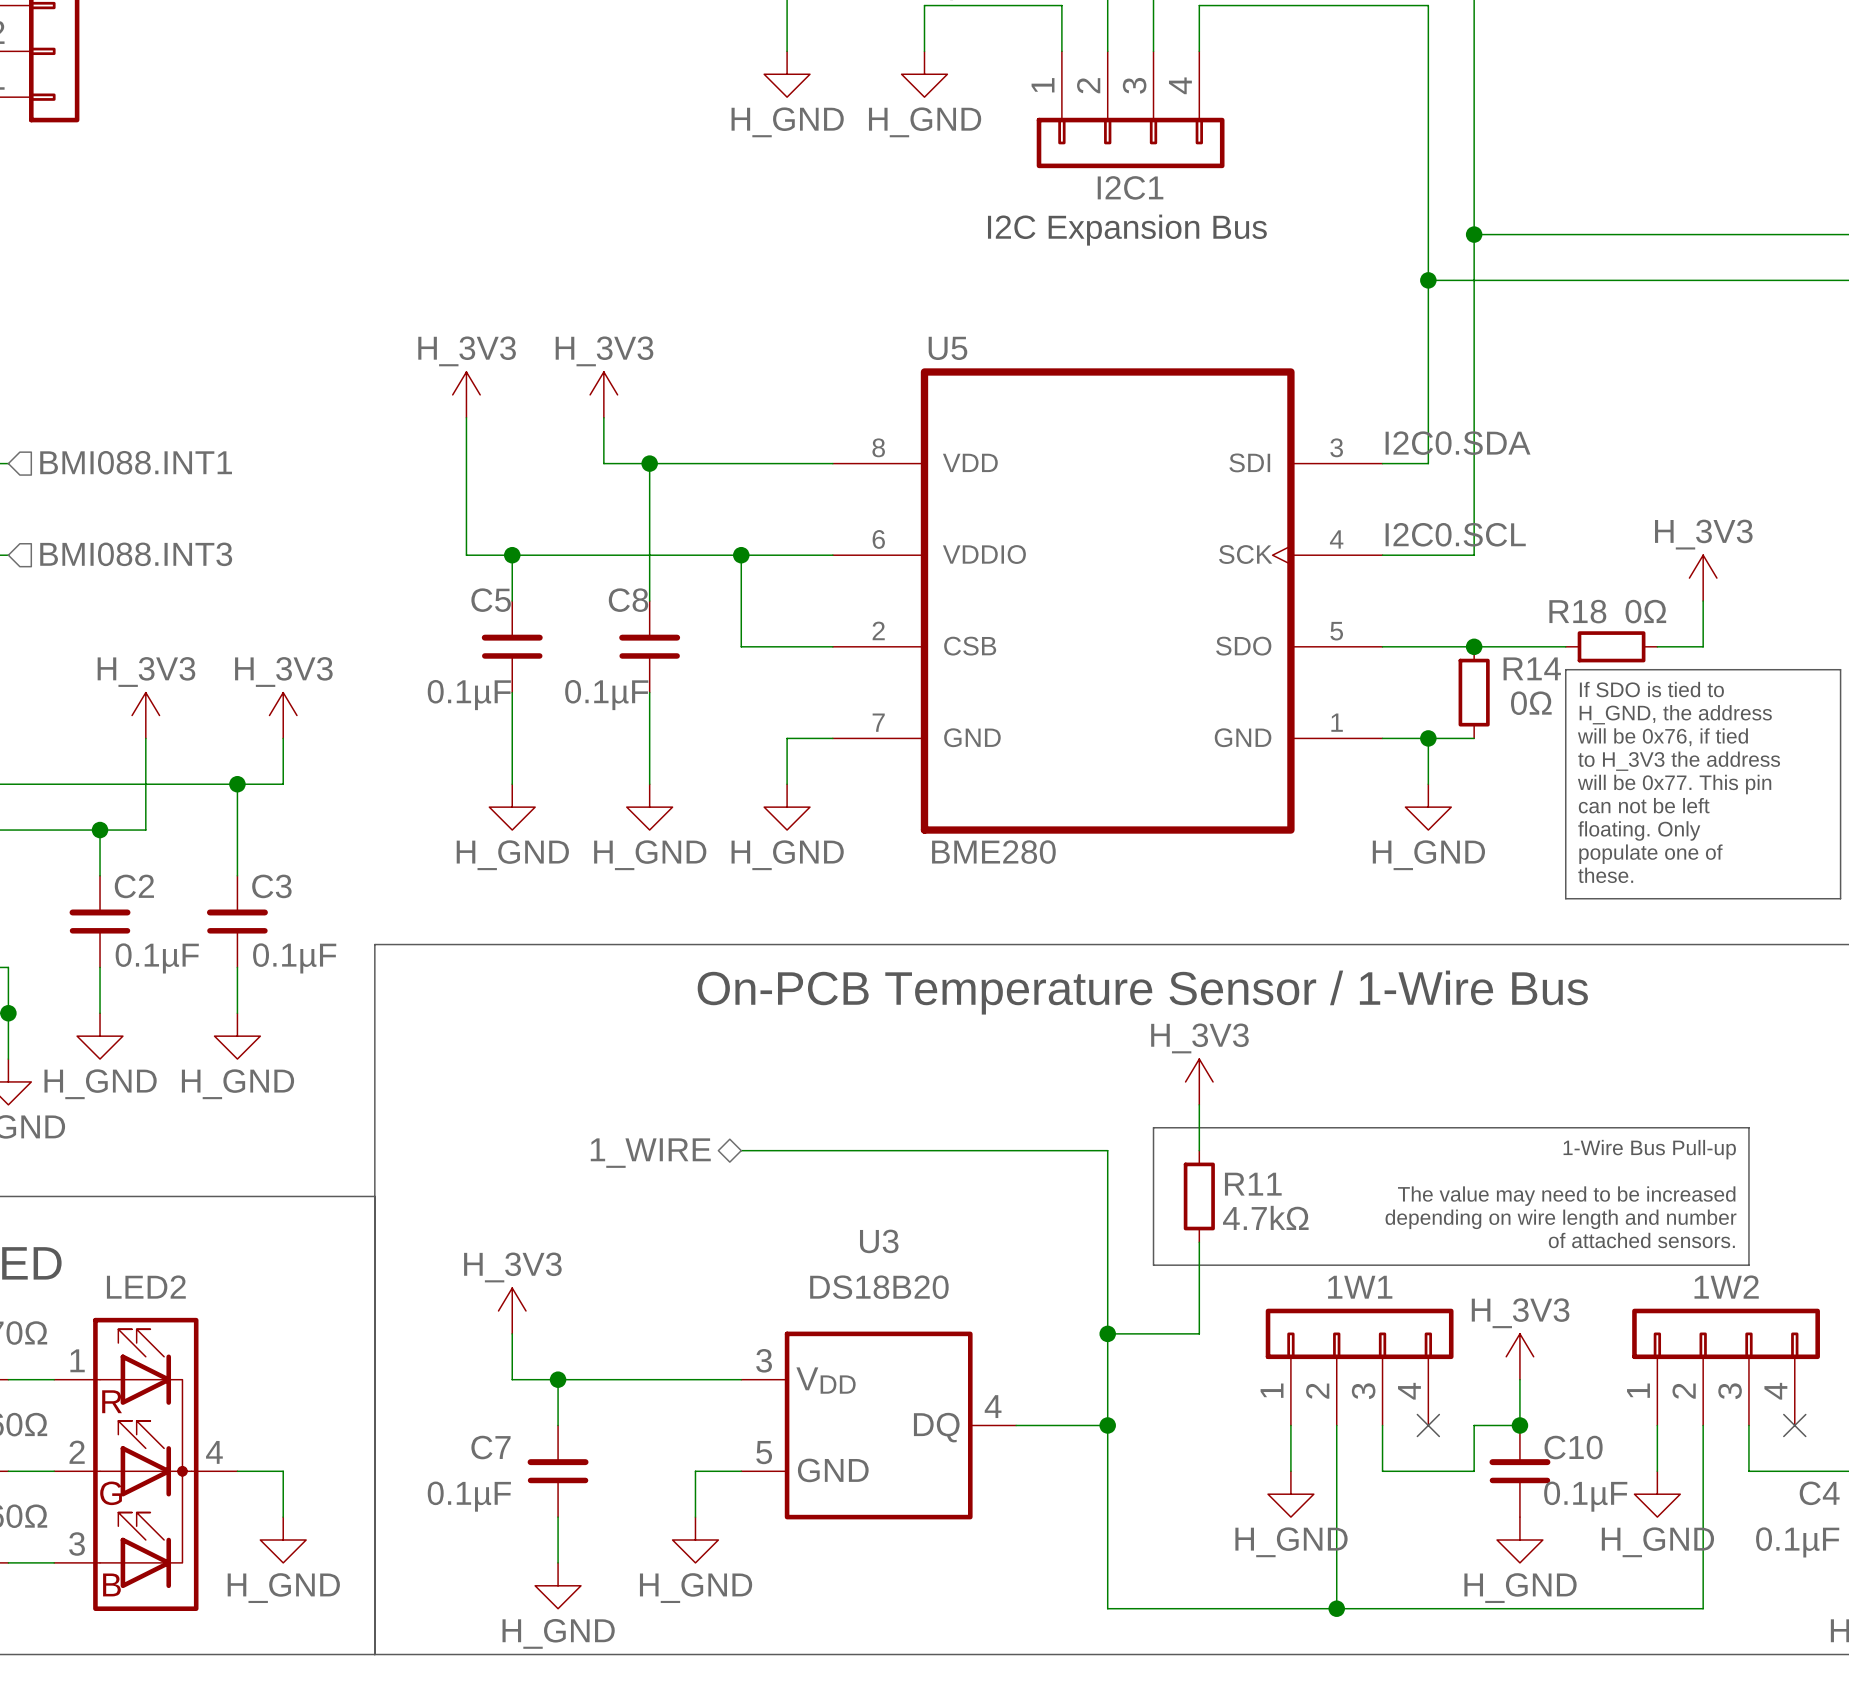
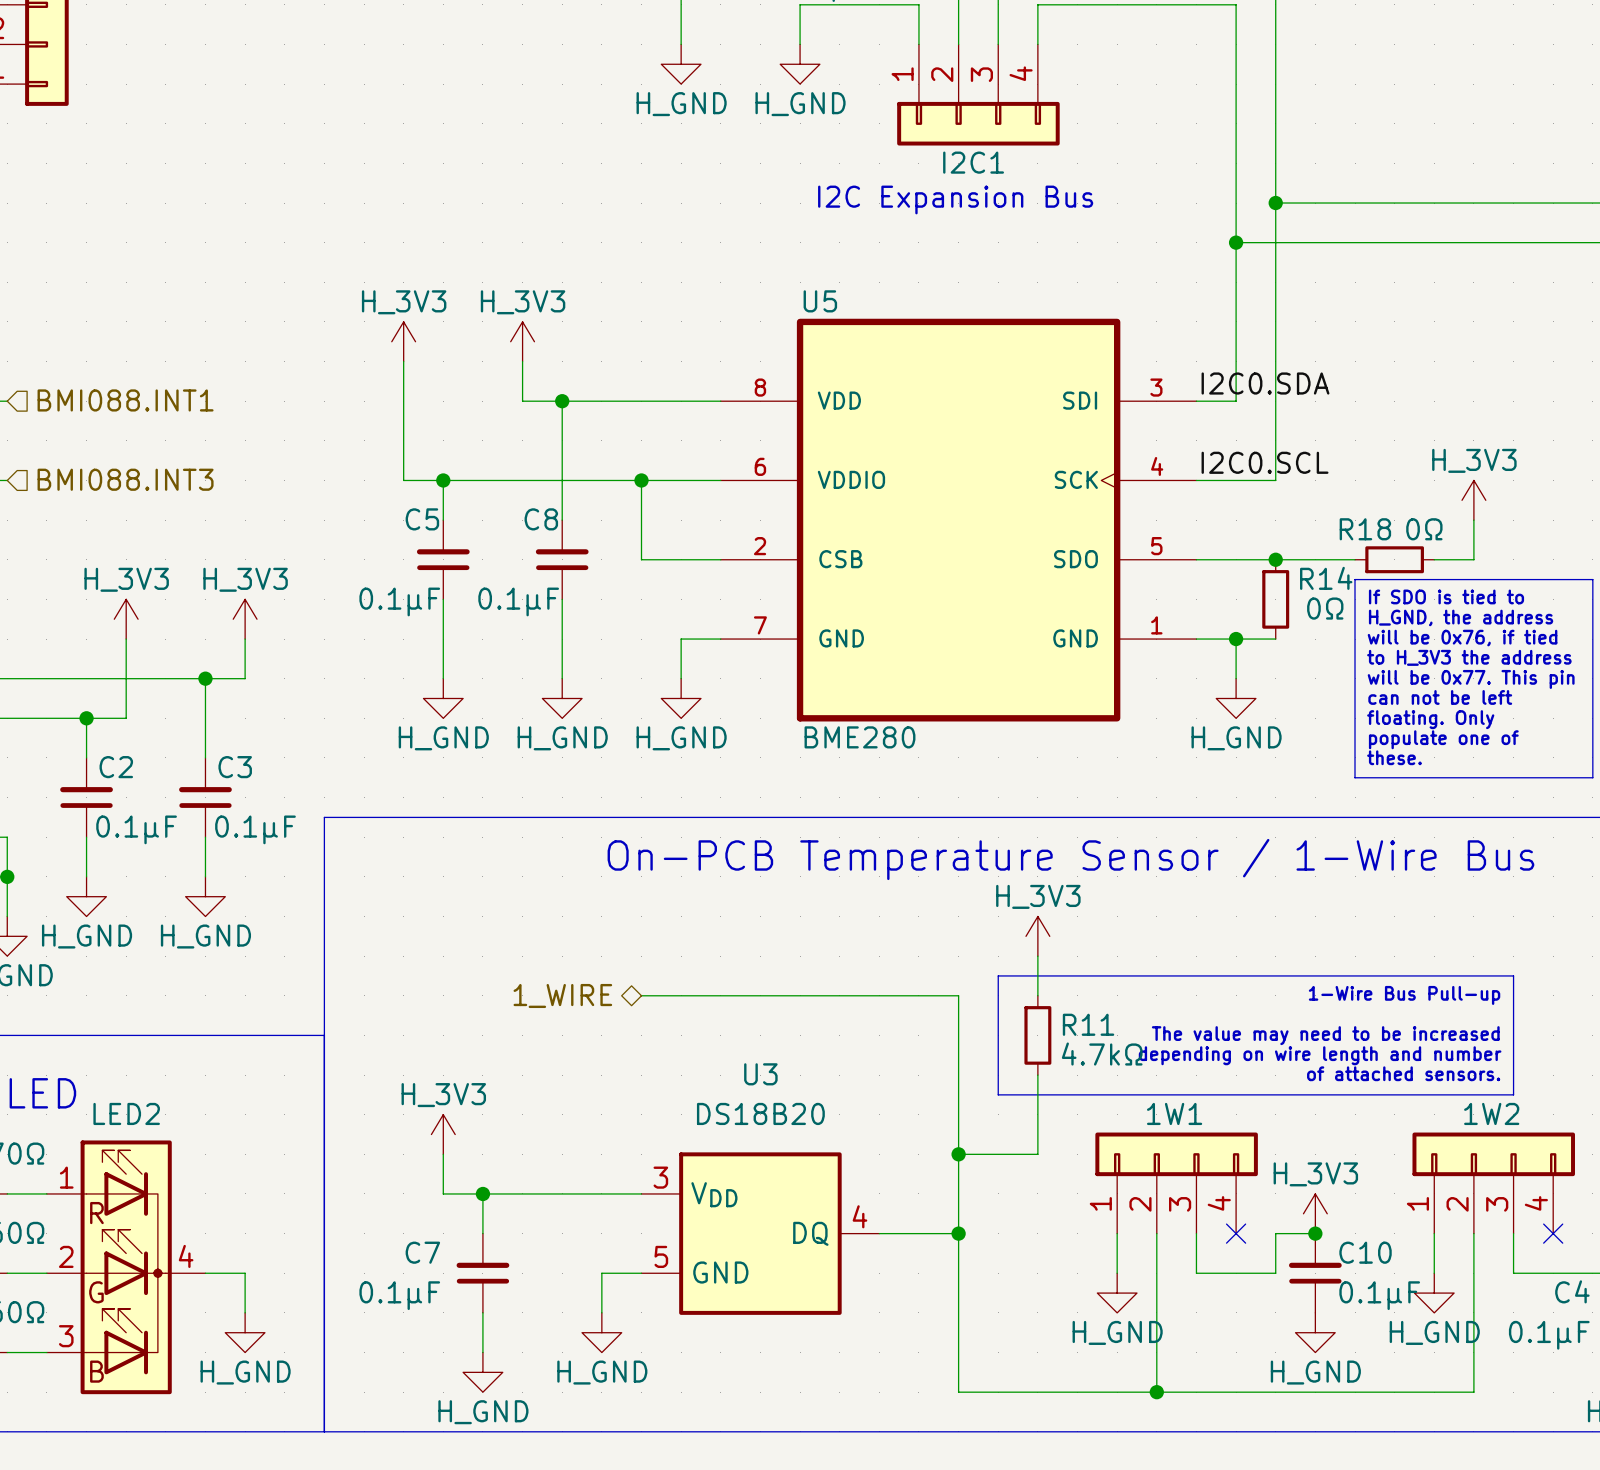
power symbol position: H_3V3 (1519, 1356) -> H_3V3 (1315, 1213)

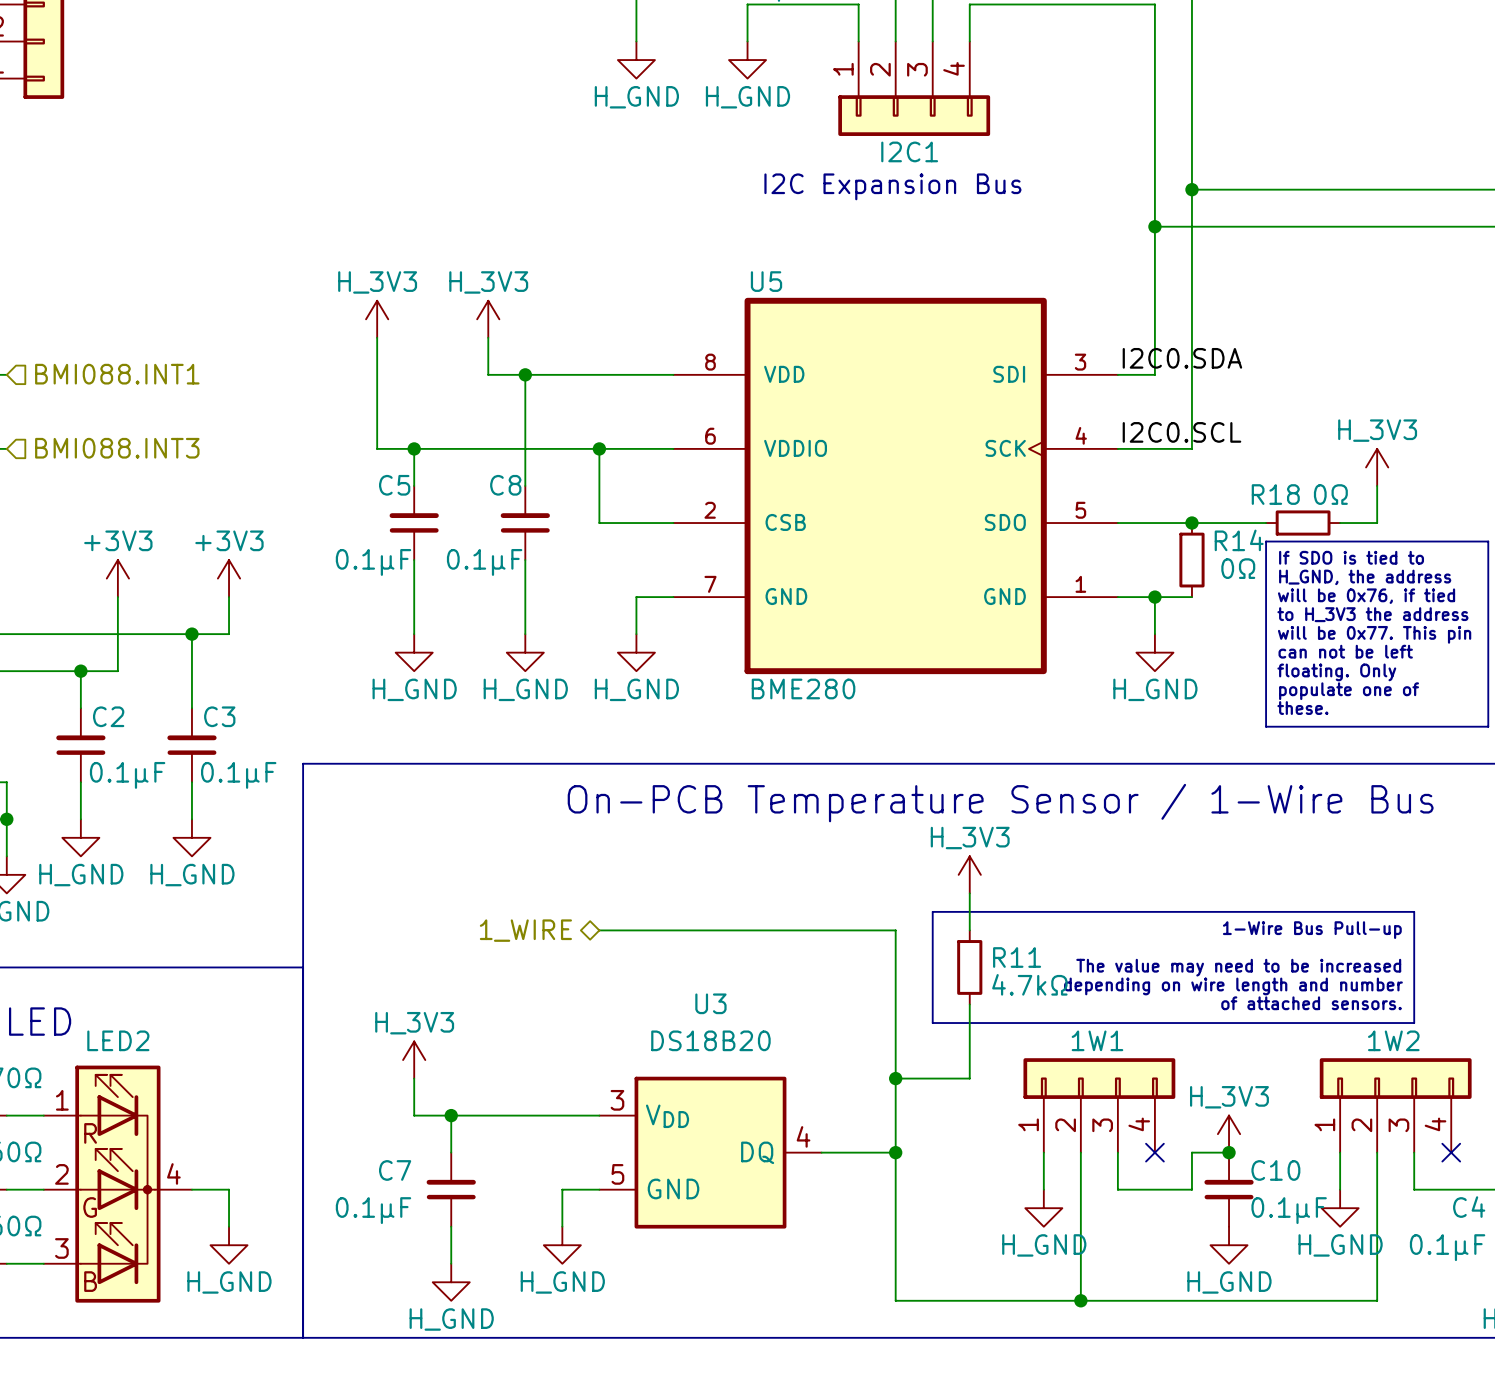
power symbol: H_3V3 (126, 619) -> +3V3 (117, 578)
power symbol: H_3V3 (245, 619) -> +3V3 (229, 578)

